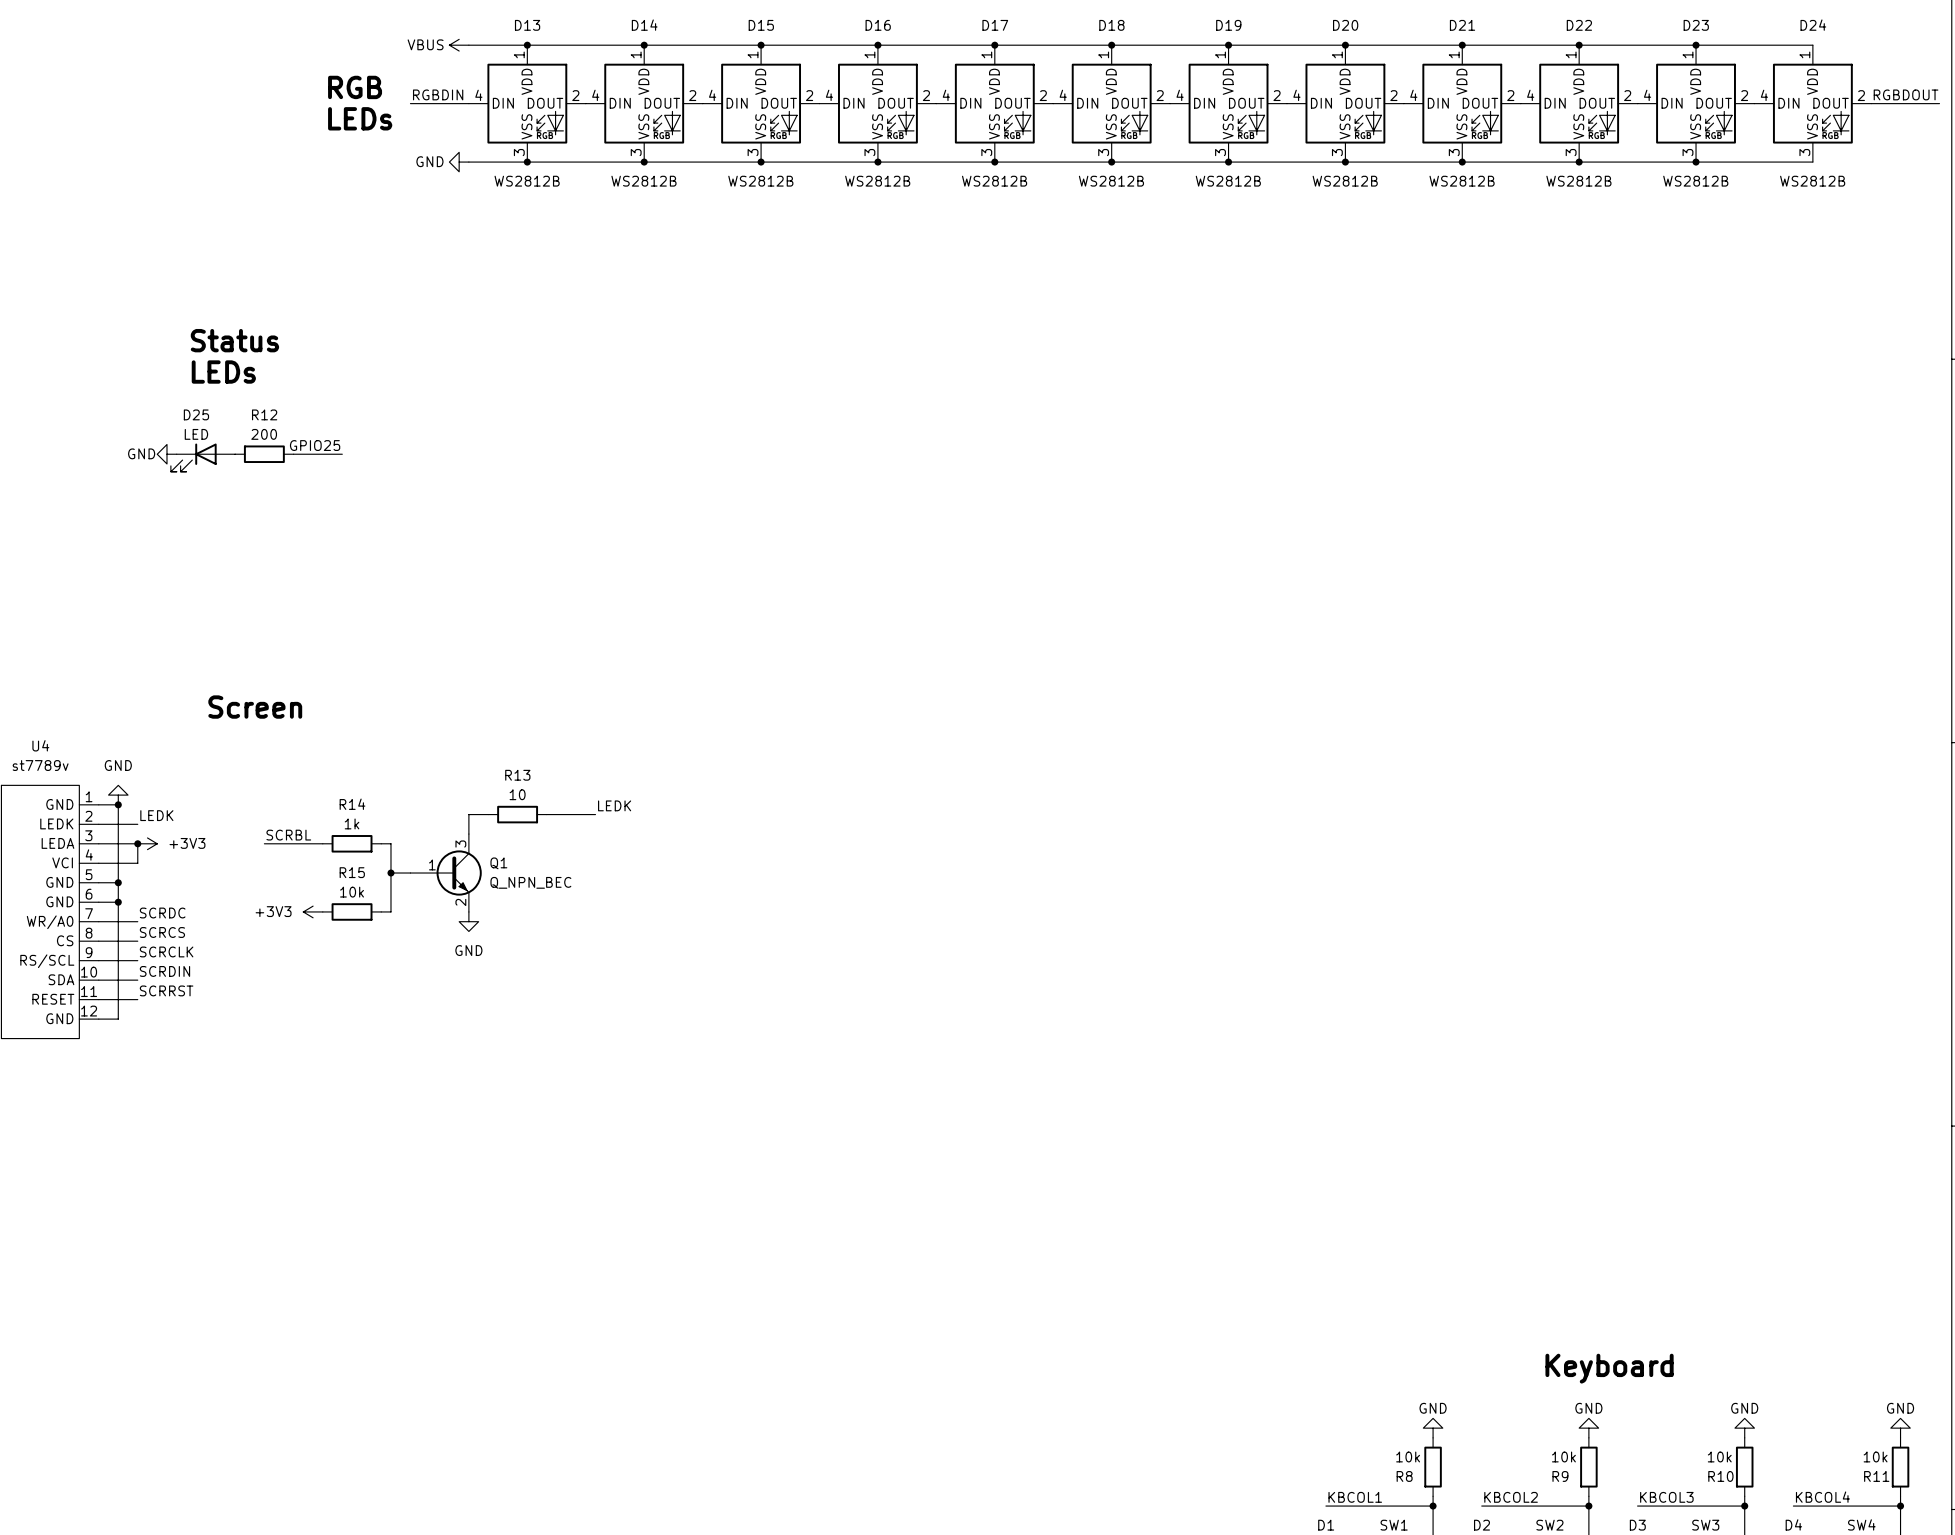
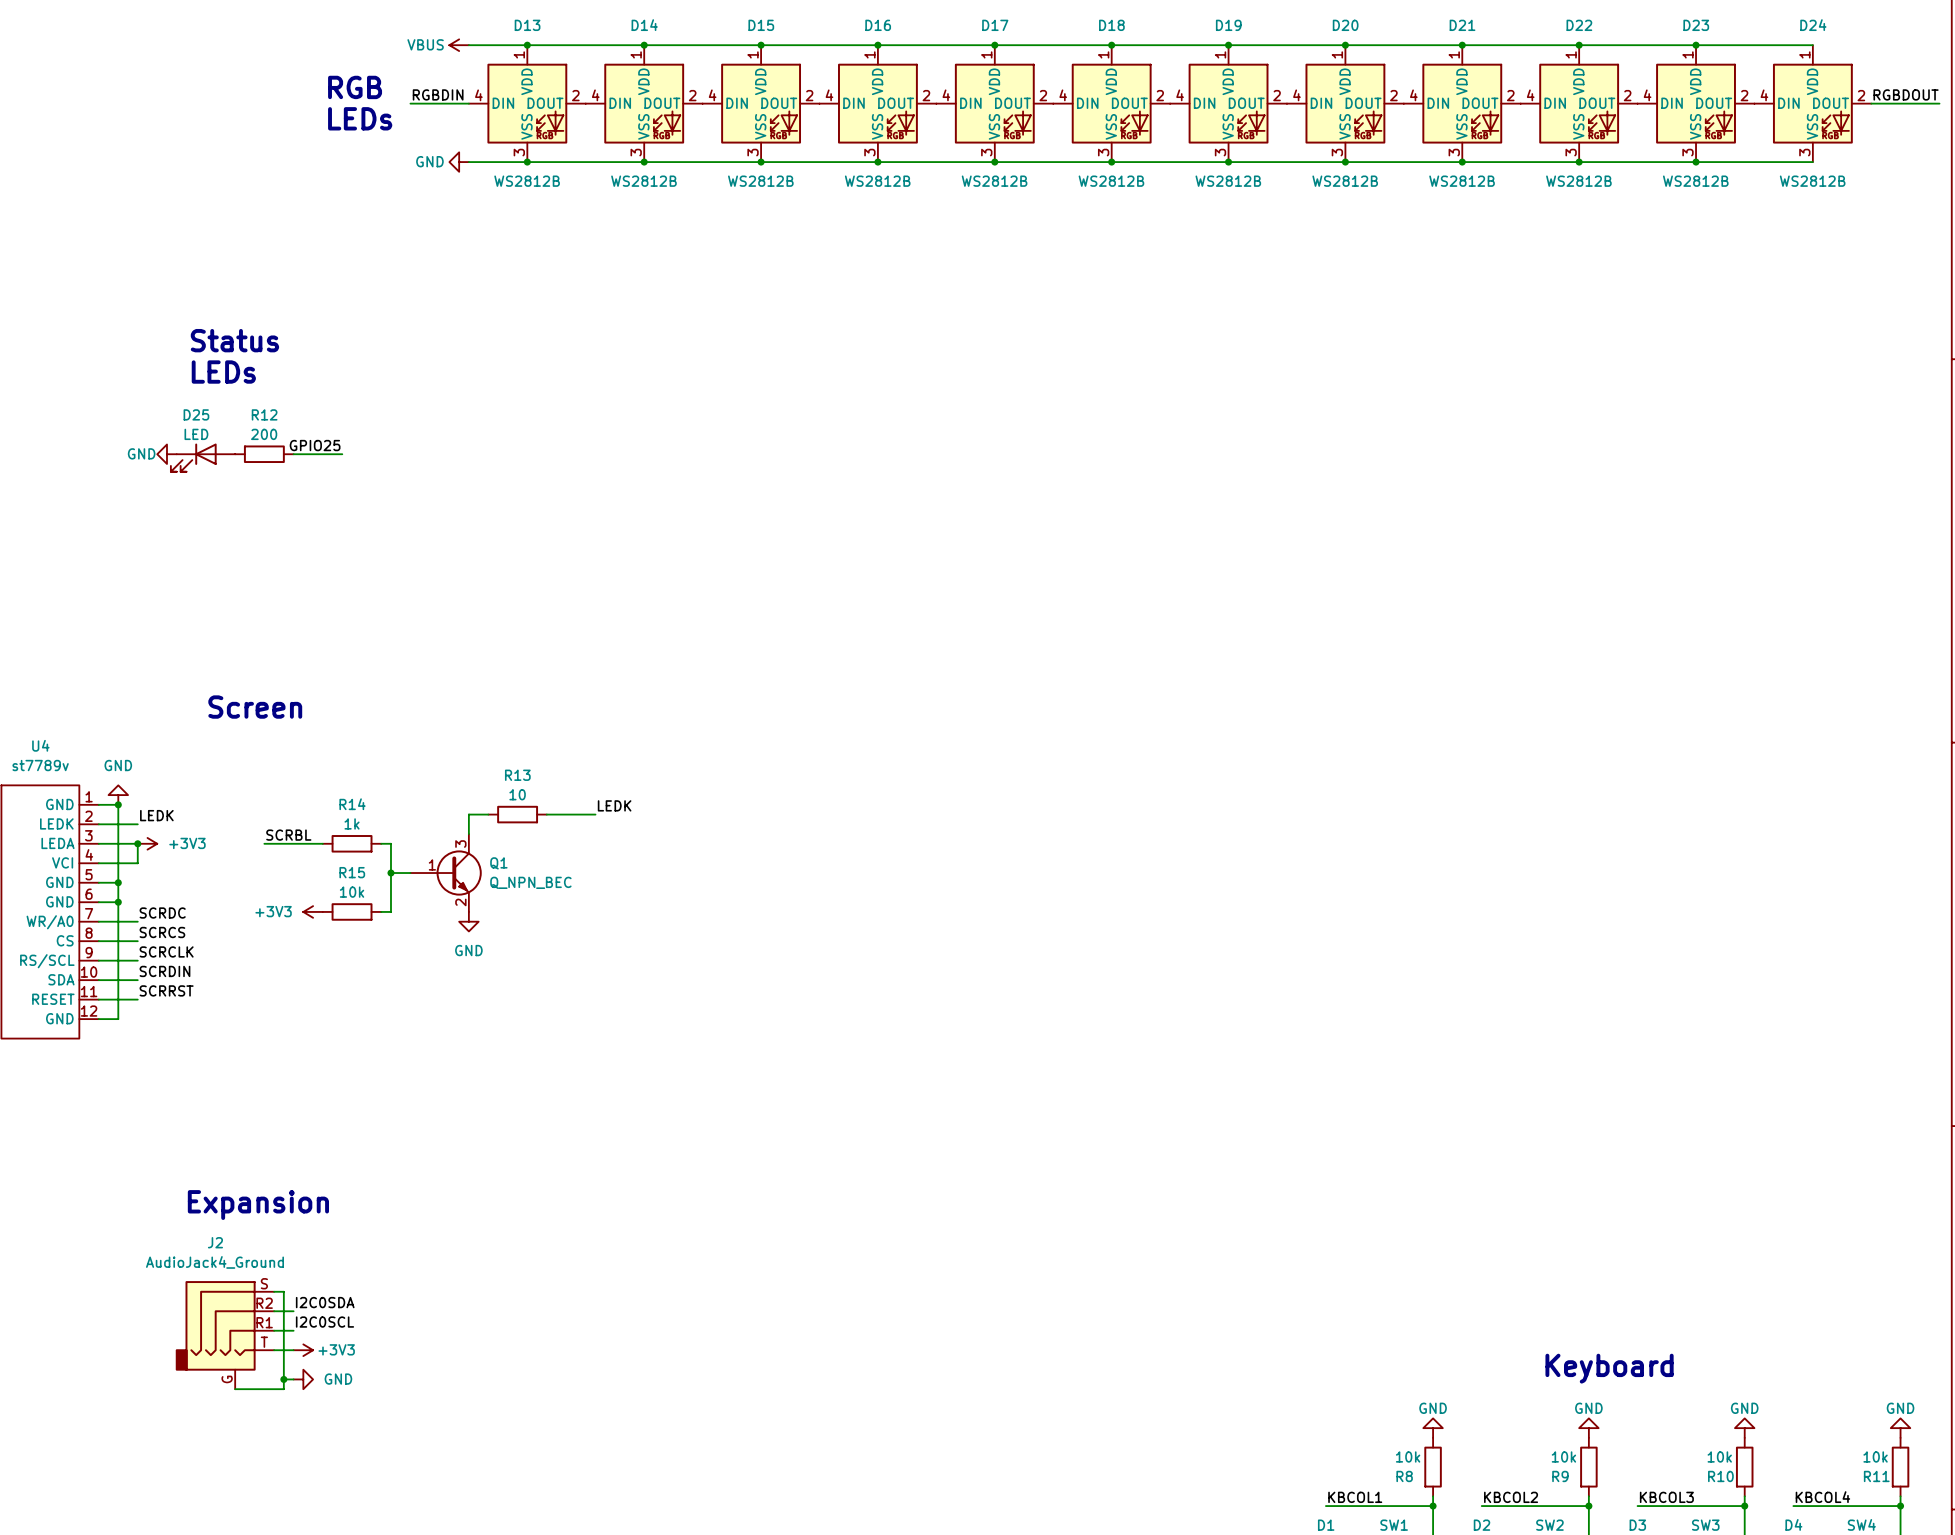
text: none -> Expansion (258, 1205)
wire: none -> (274, 1291) (283, 1291) (283, 1389) (235, 1389)
label: none -> I2C0SDA (325, 1302)
wire: none -> (274, 1311) (293, 1311)
label: none -> I2C0SCL (324, 1322)
wire: none -> (274, 1330) (293, 1330)
J2: none -> AudioJack4_Ground (224, 1335)
wire: none -> (274, 1350) (293, 1350)
power symbol: none -> +3V3 (303, 1350)
wire: none -> (283, 1379) (293, 1379)
junction: none -> (283, 1379)
power symbol: none -> GND (303, 1379)

